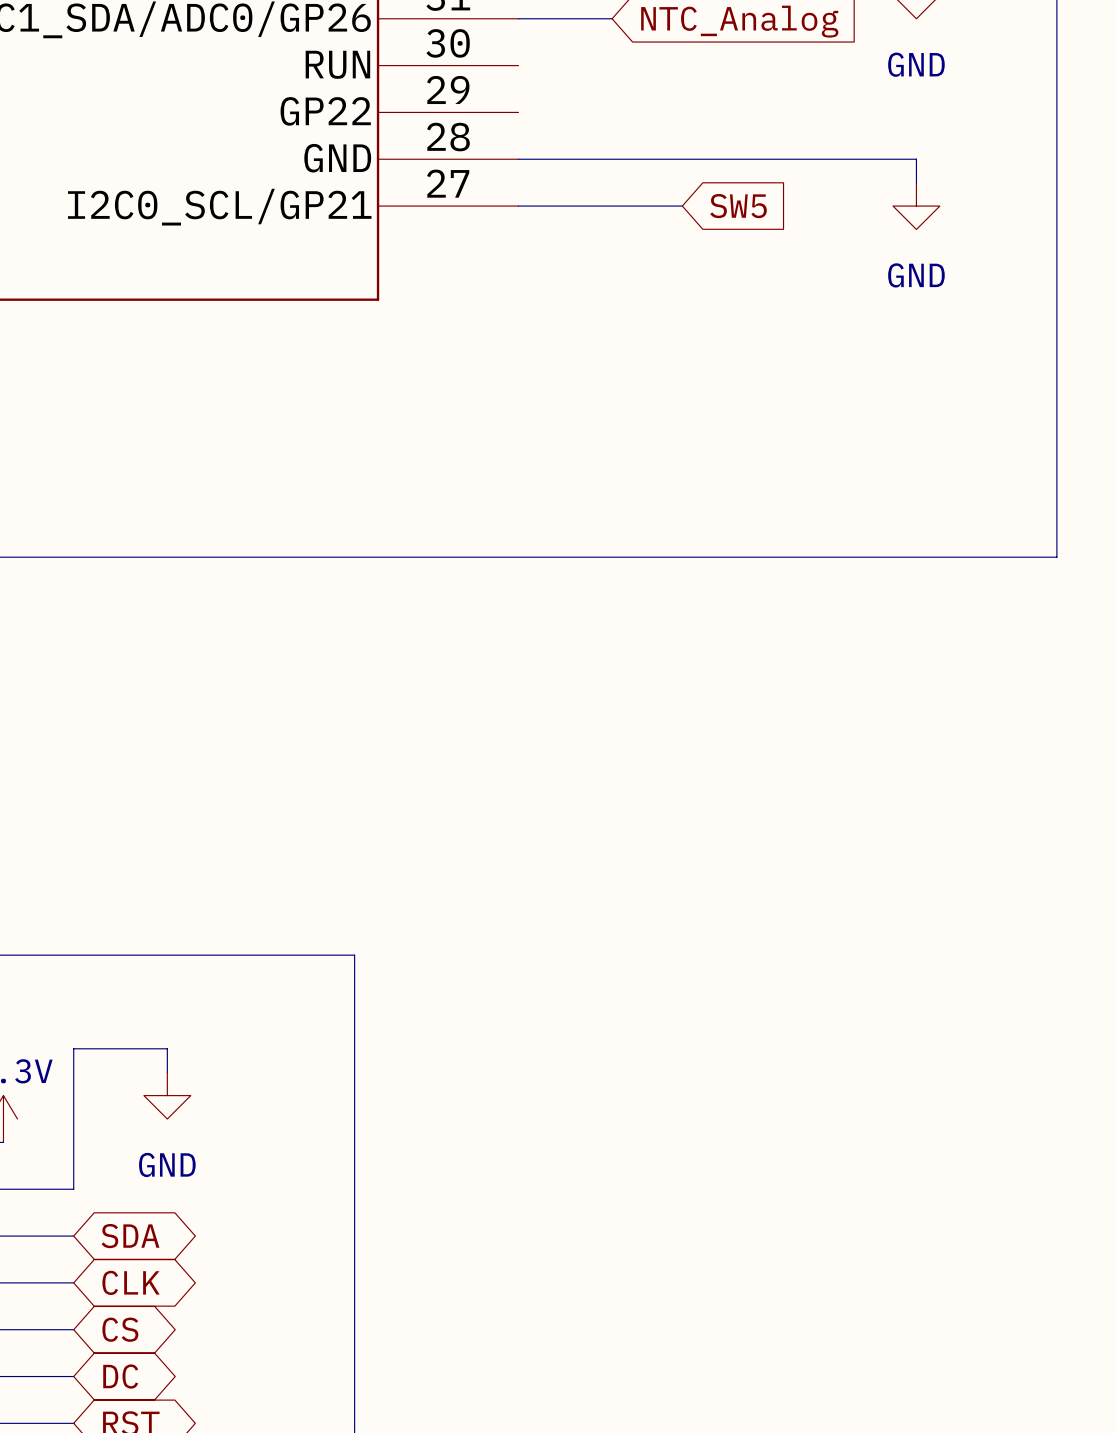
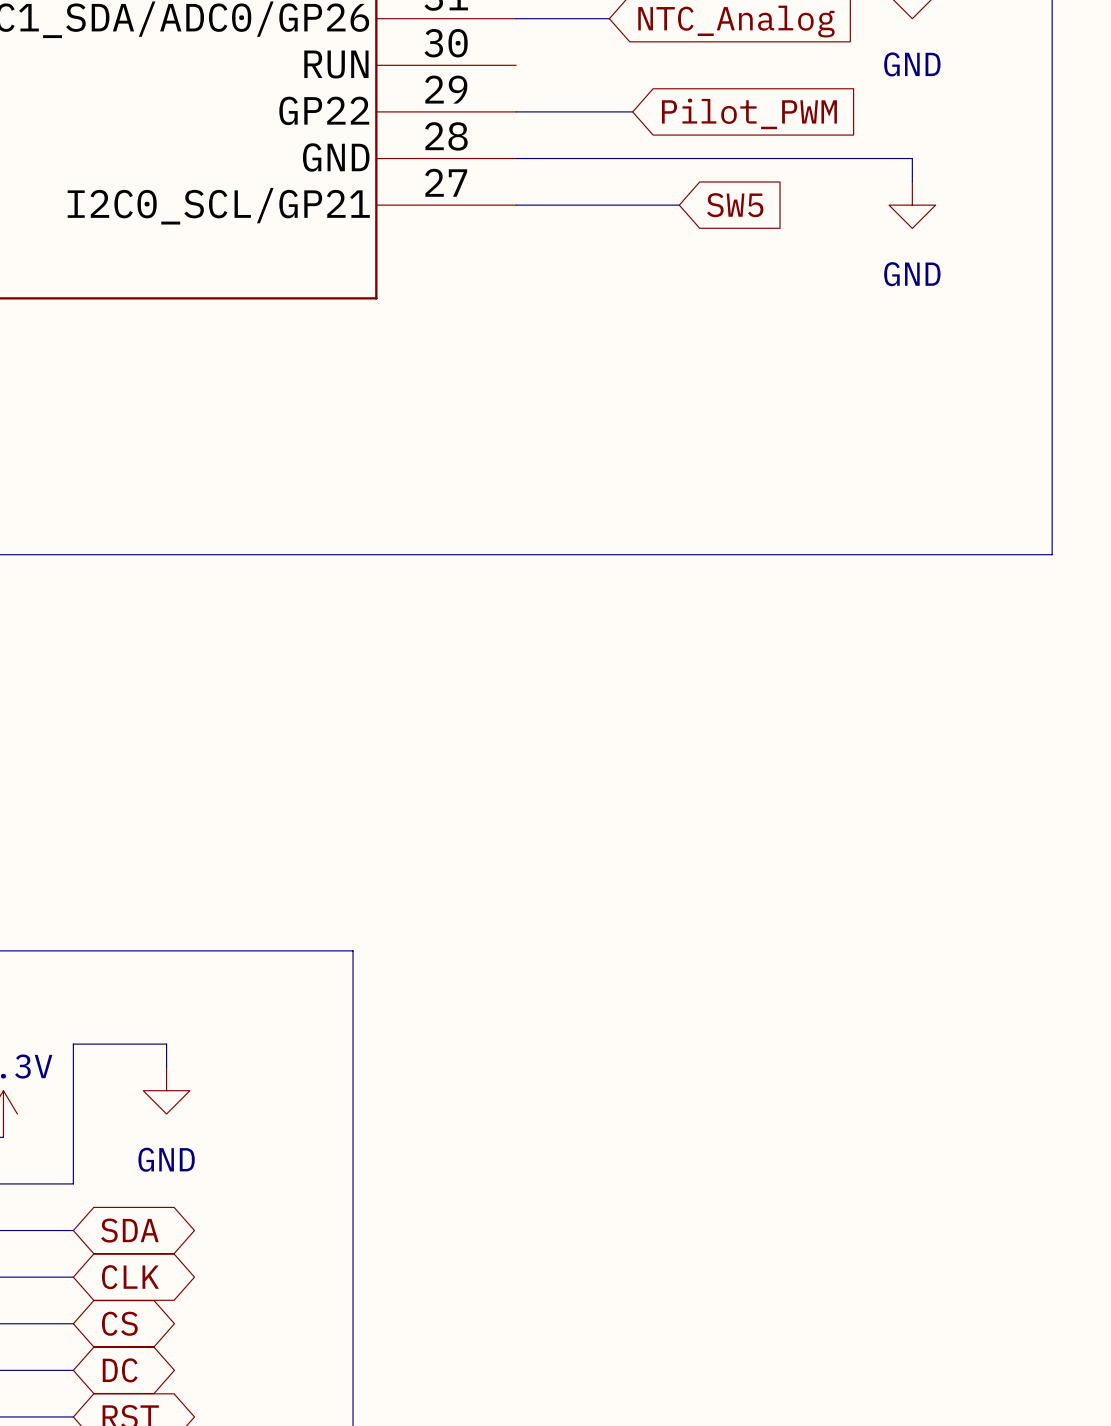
wire: none -> (516, 111) (632, 111)
global label: none -> Pilot_PWM (749, 113)

